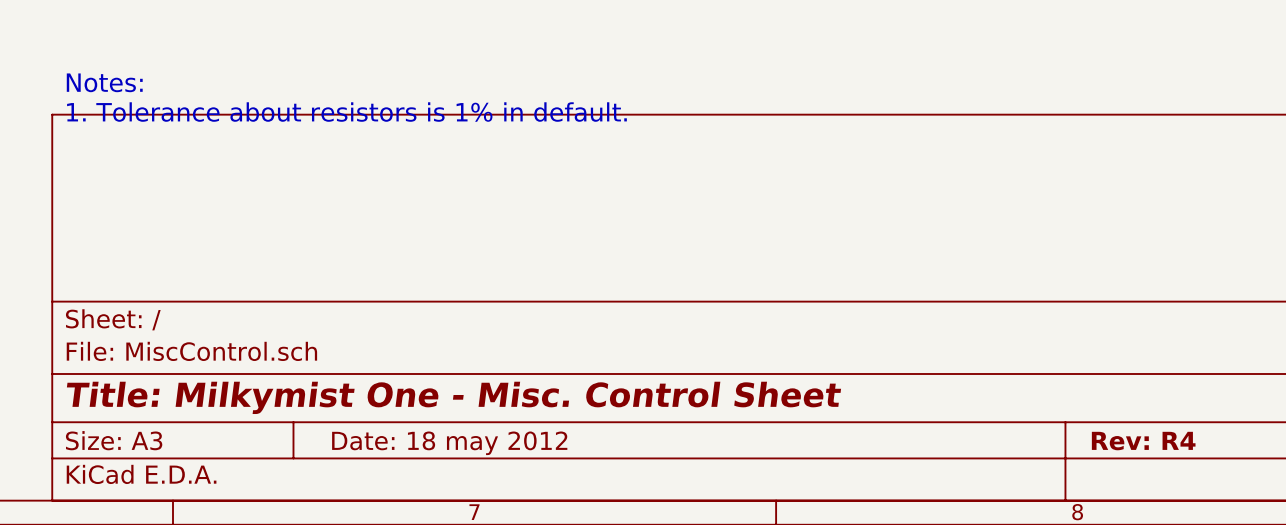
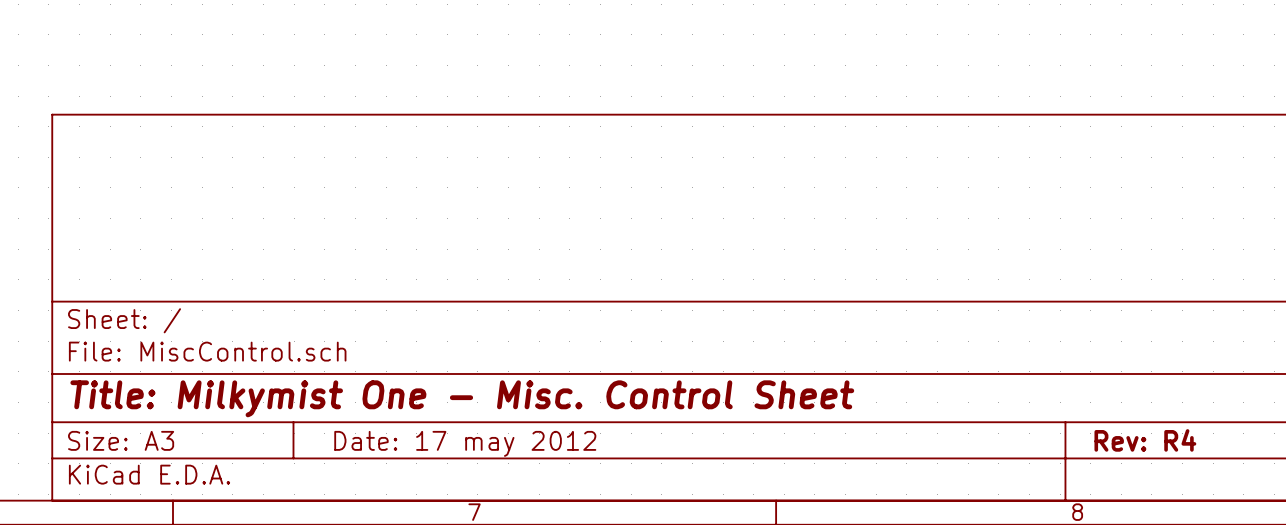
text: Notes: (104, 82) -> none
text: 1. Tolerance about resistors is 1% in default. (346, 112) -> none
title block: Date: 18 may 2012 (449, 443) -> Date: 17 may 2012 (465, 443)

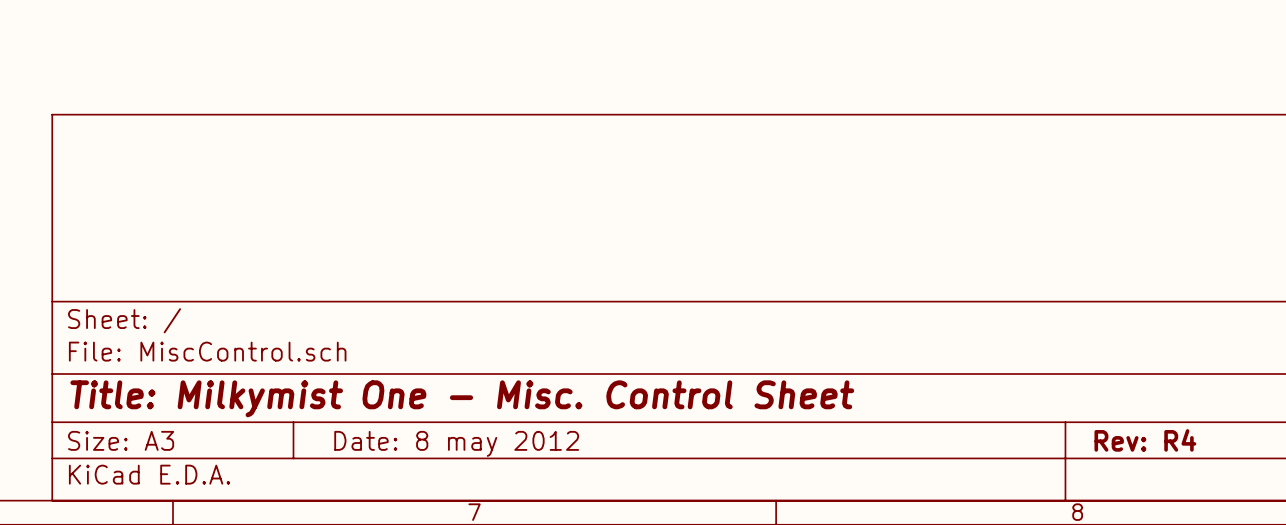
title block: Date: 17 may 2012 (465, 443) -> Date: 8 may 2012 (456, 443)

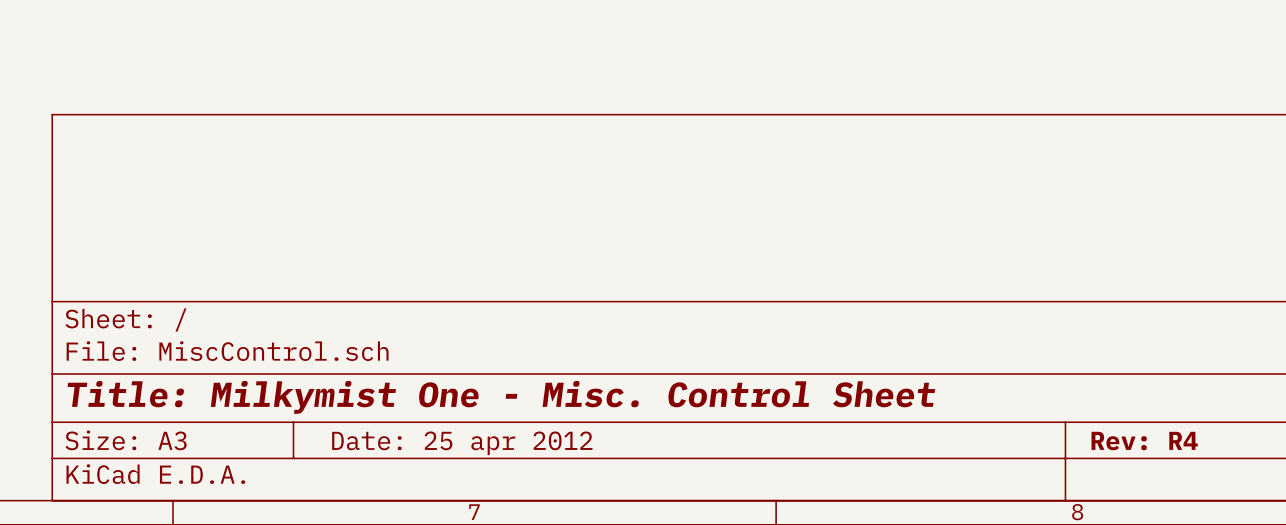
title block: Date: 8 may 2012 (456, 443) -> Date: 25 apr 2012 (462, 443)

